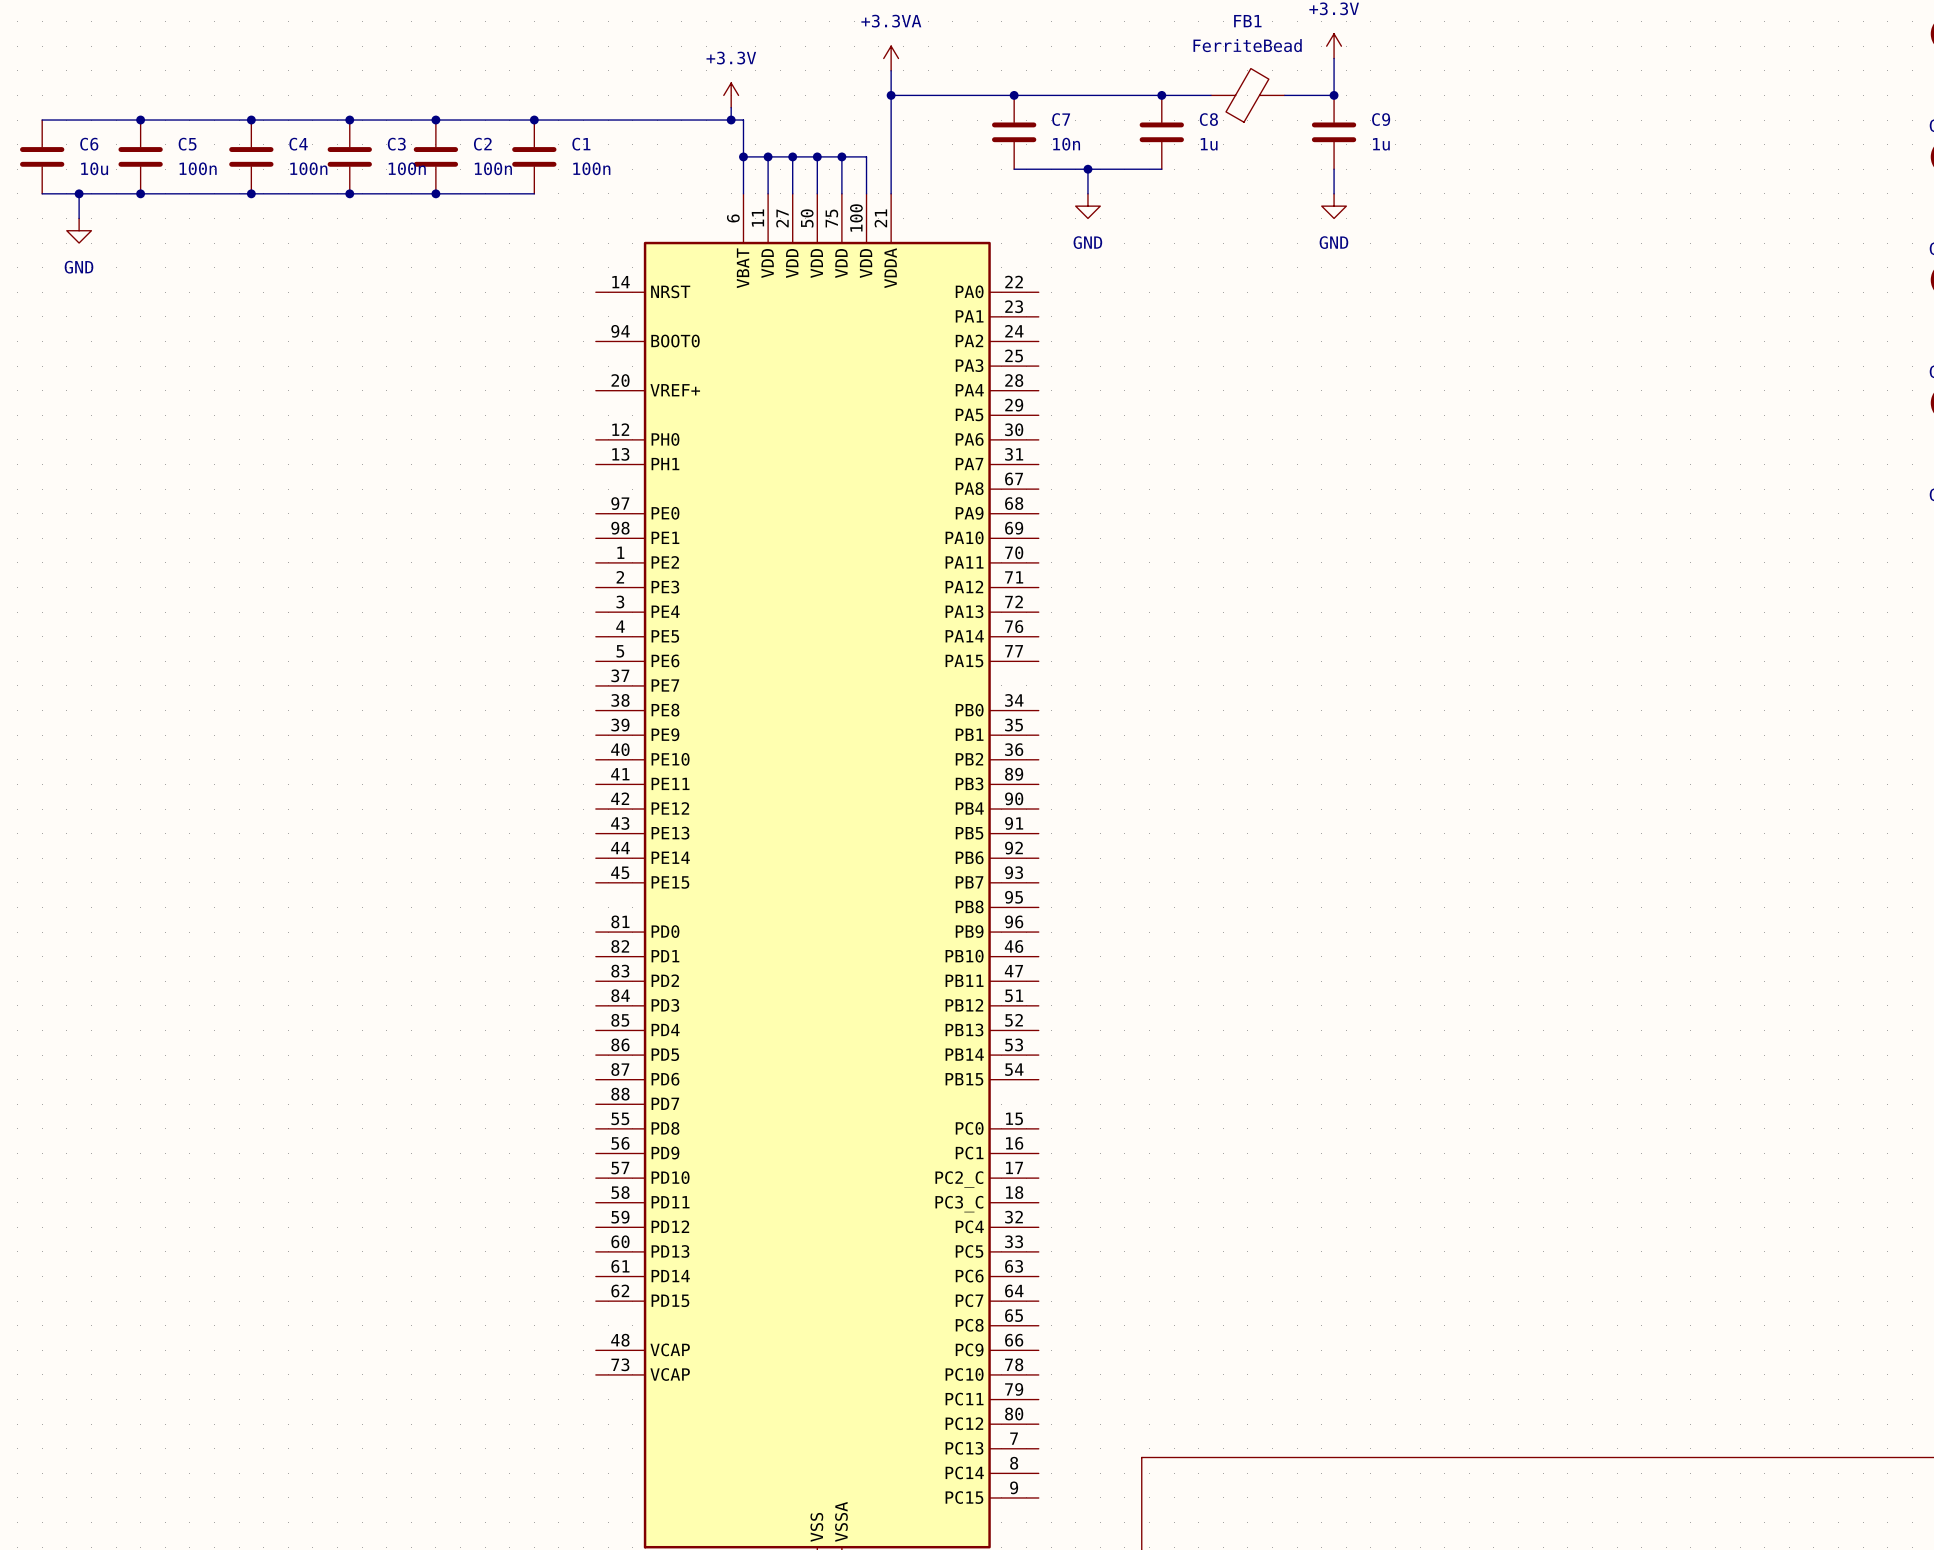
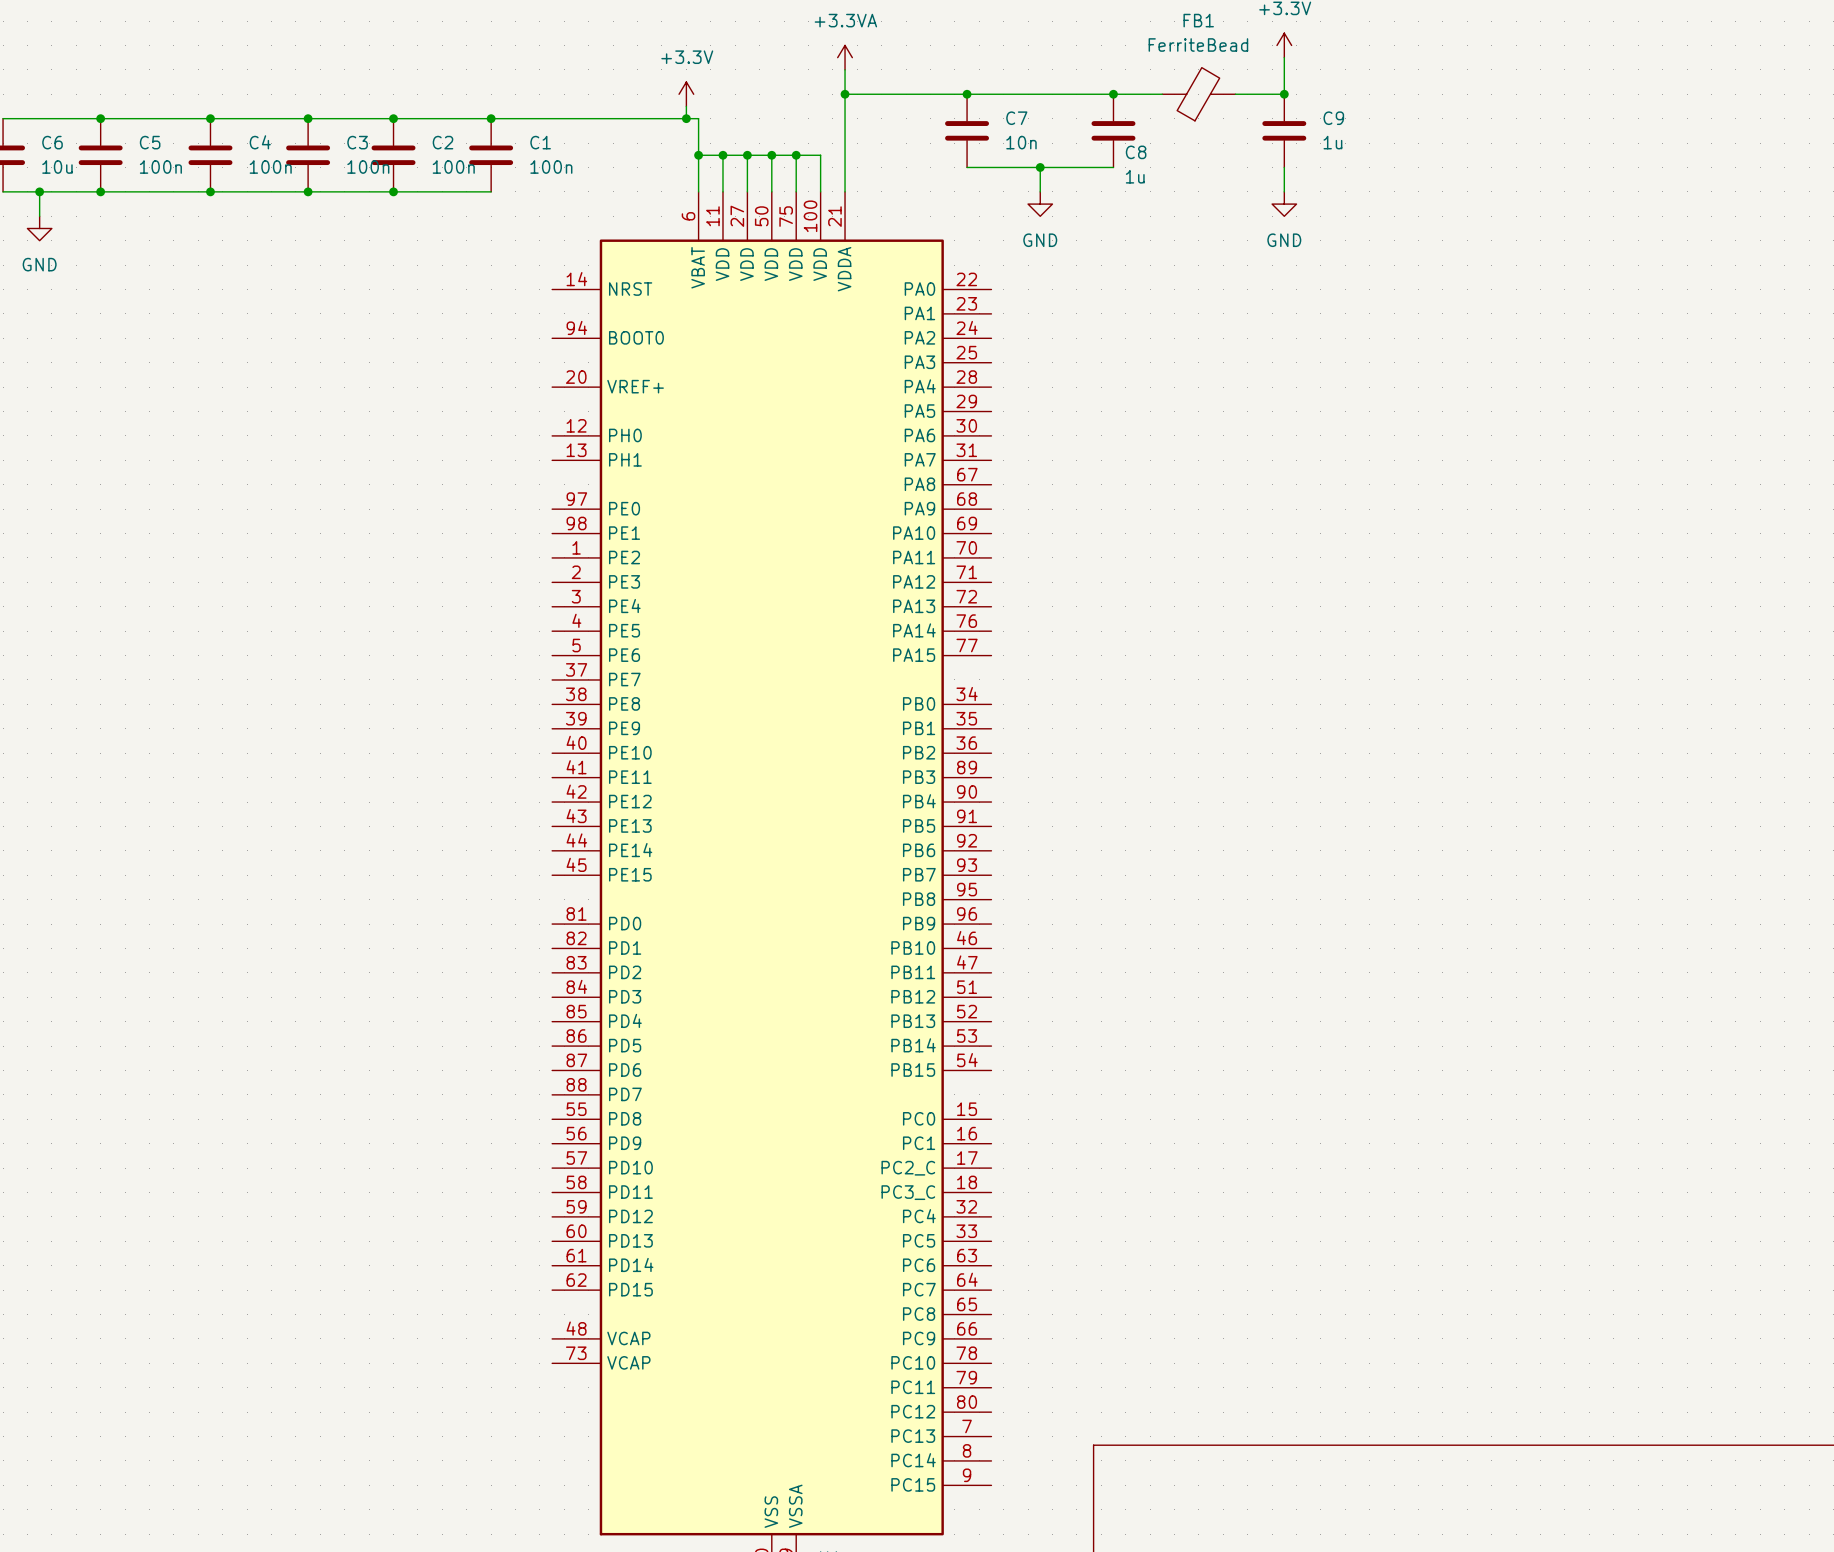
C8 name position: C8 (1208, 119) -> C8 (1136, 152)
C8 value position: 1u (1209, 144) -> 1u (1135, 176)

